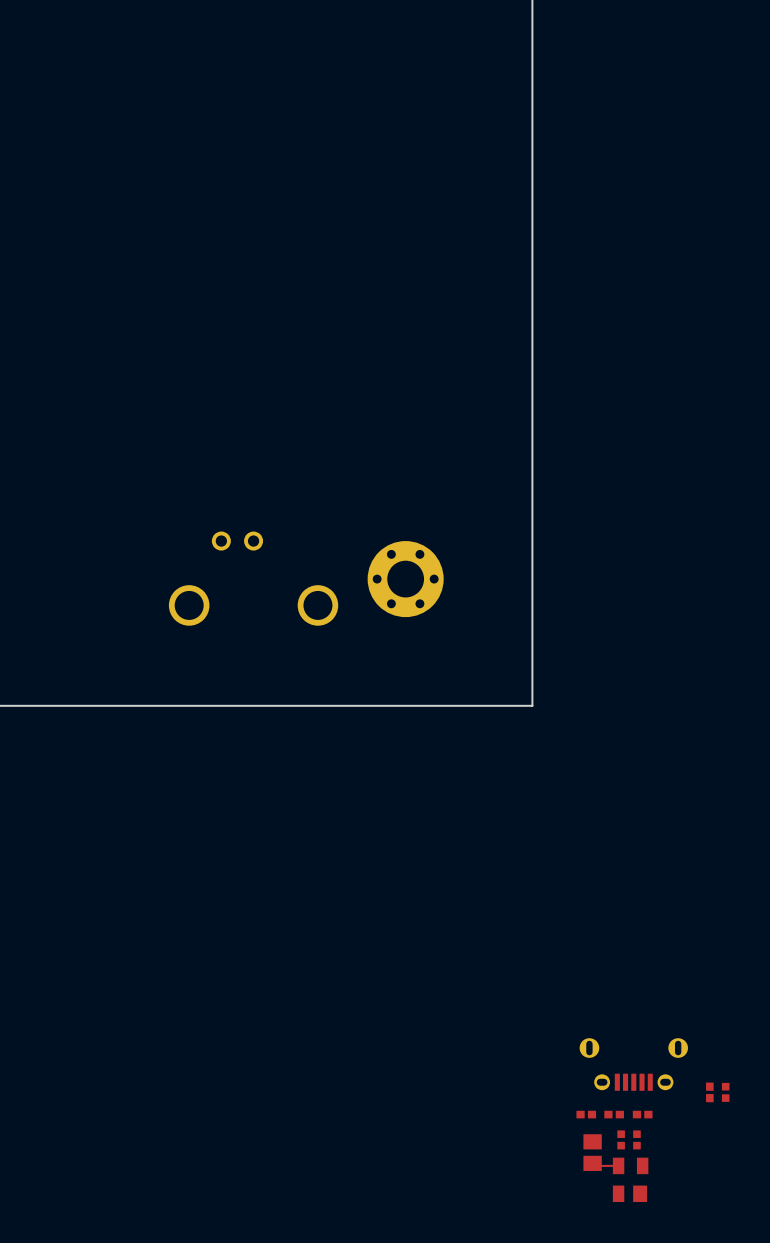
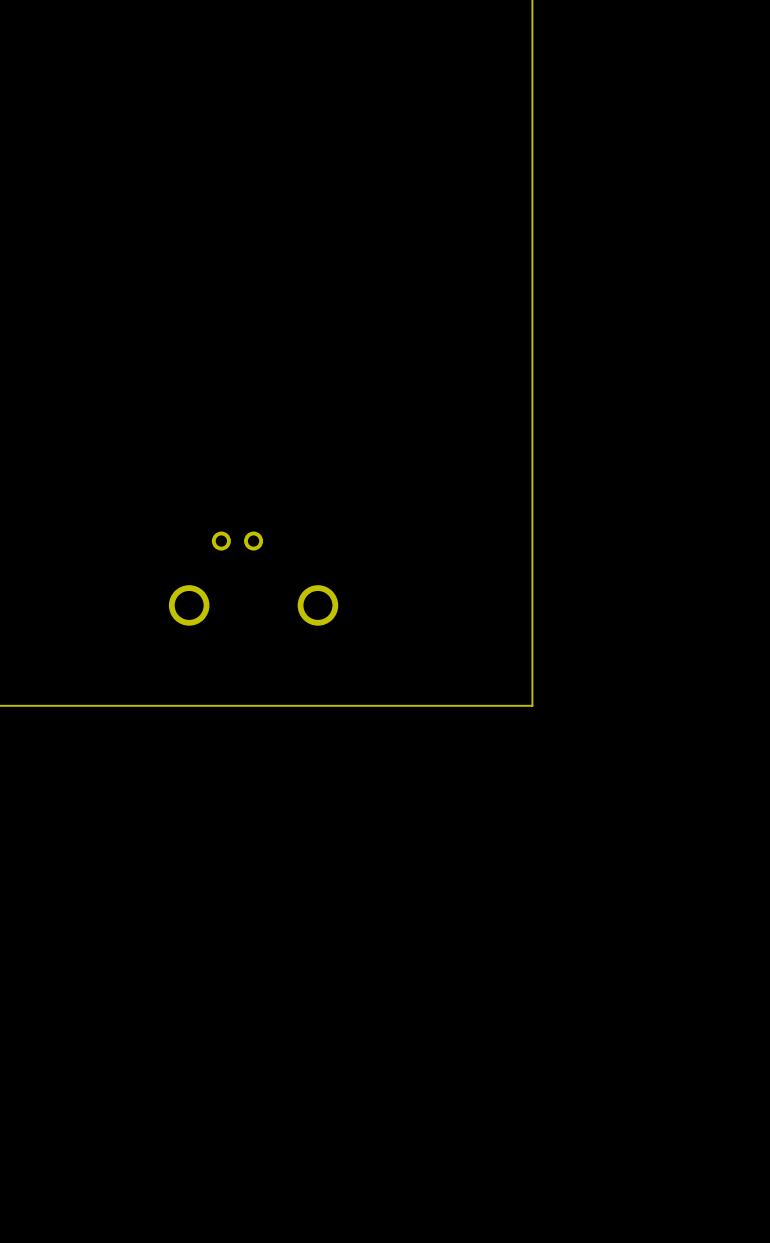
part: (405, 579) -> none
part: (633, 1064) -> none
part: (709, 1092) -> none
part: (725, 1092) -> none
part: (586, 1114) -> none
part: (614, 1114) -> none
part: (642, 1114) -> none
part: (621, 1139) -> none
part: (636, 1139) -> none
part: (592, 1152) -> none
top track: (592, 1163) (595, 1165) (618, 1165) -> none
part: (630, 1179) -> none

